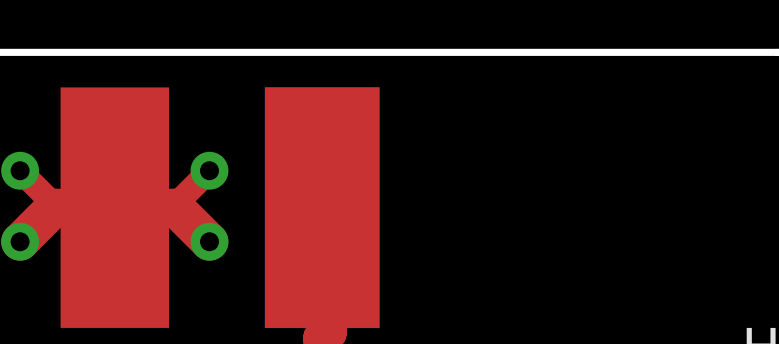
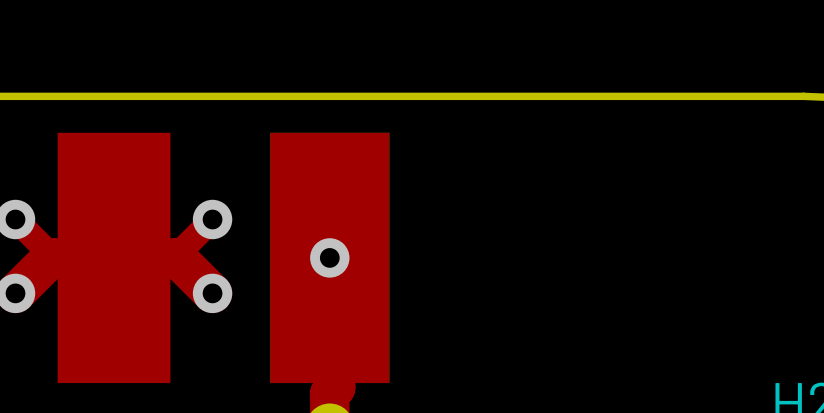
via: none -> (329, 257)

